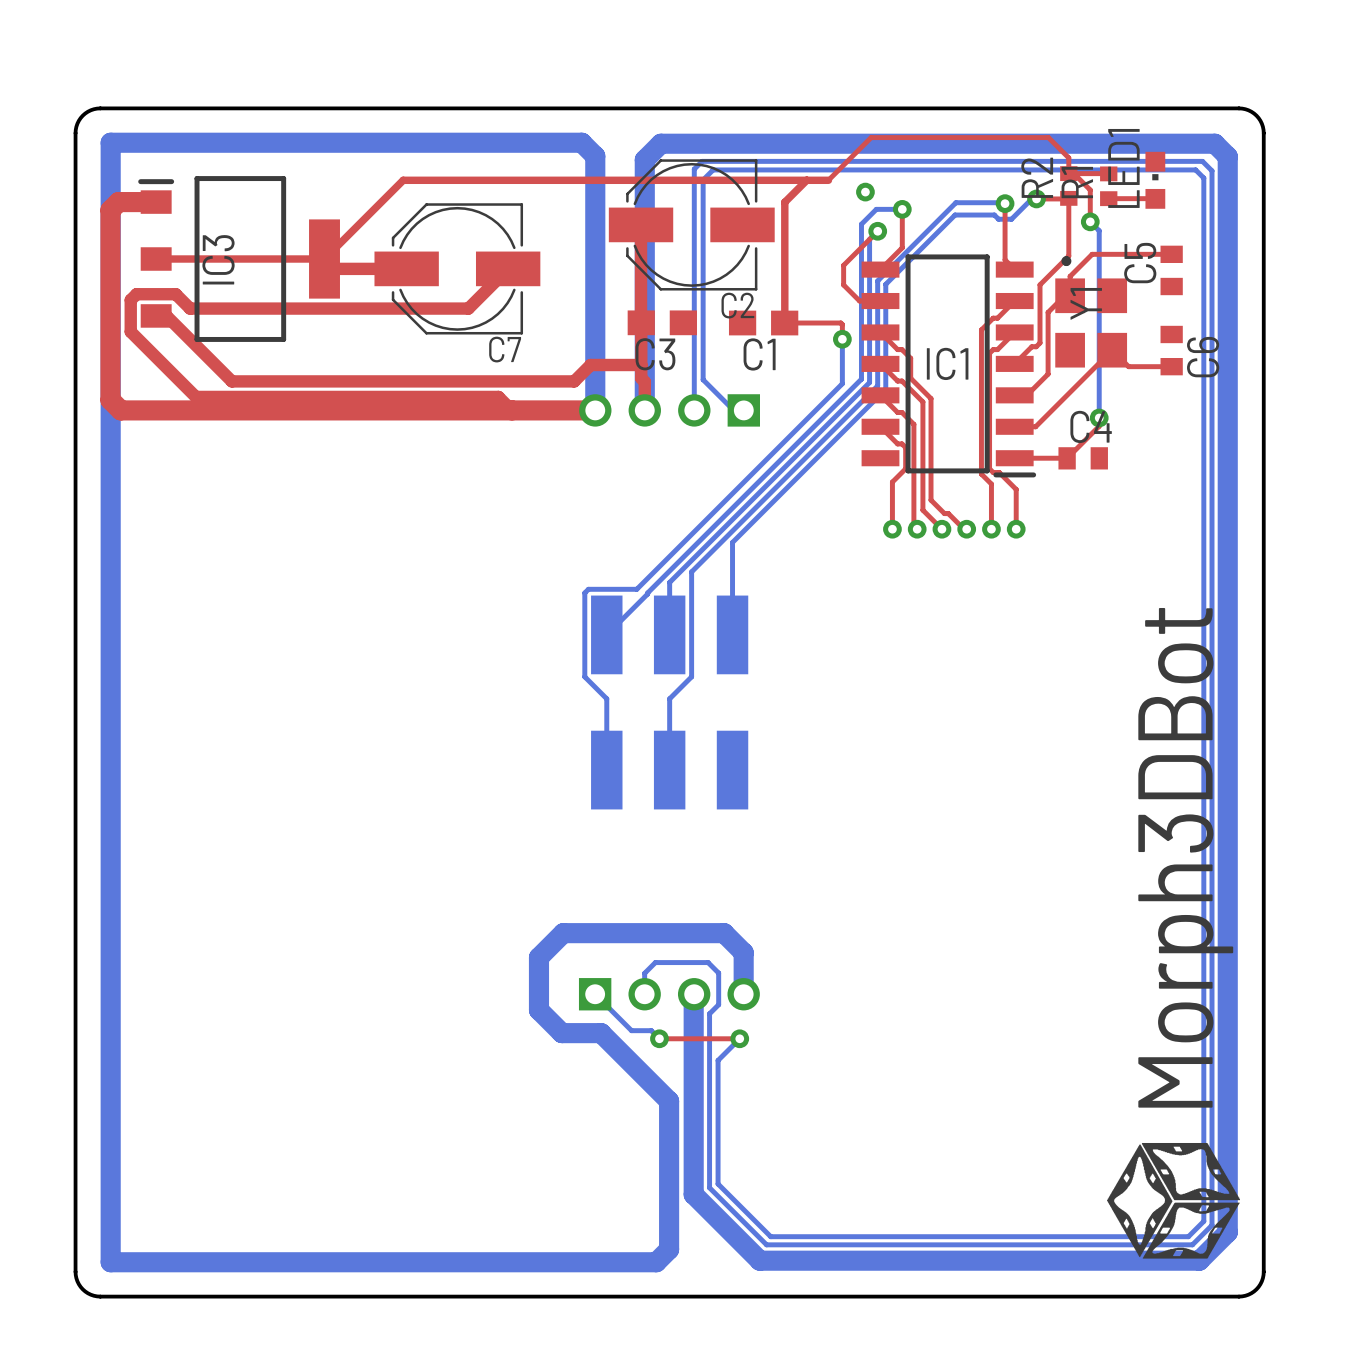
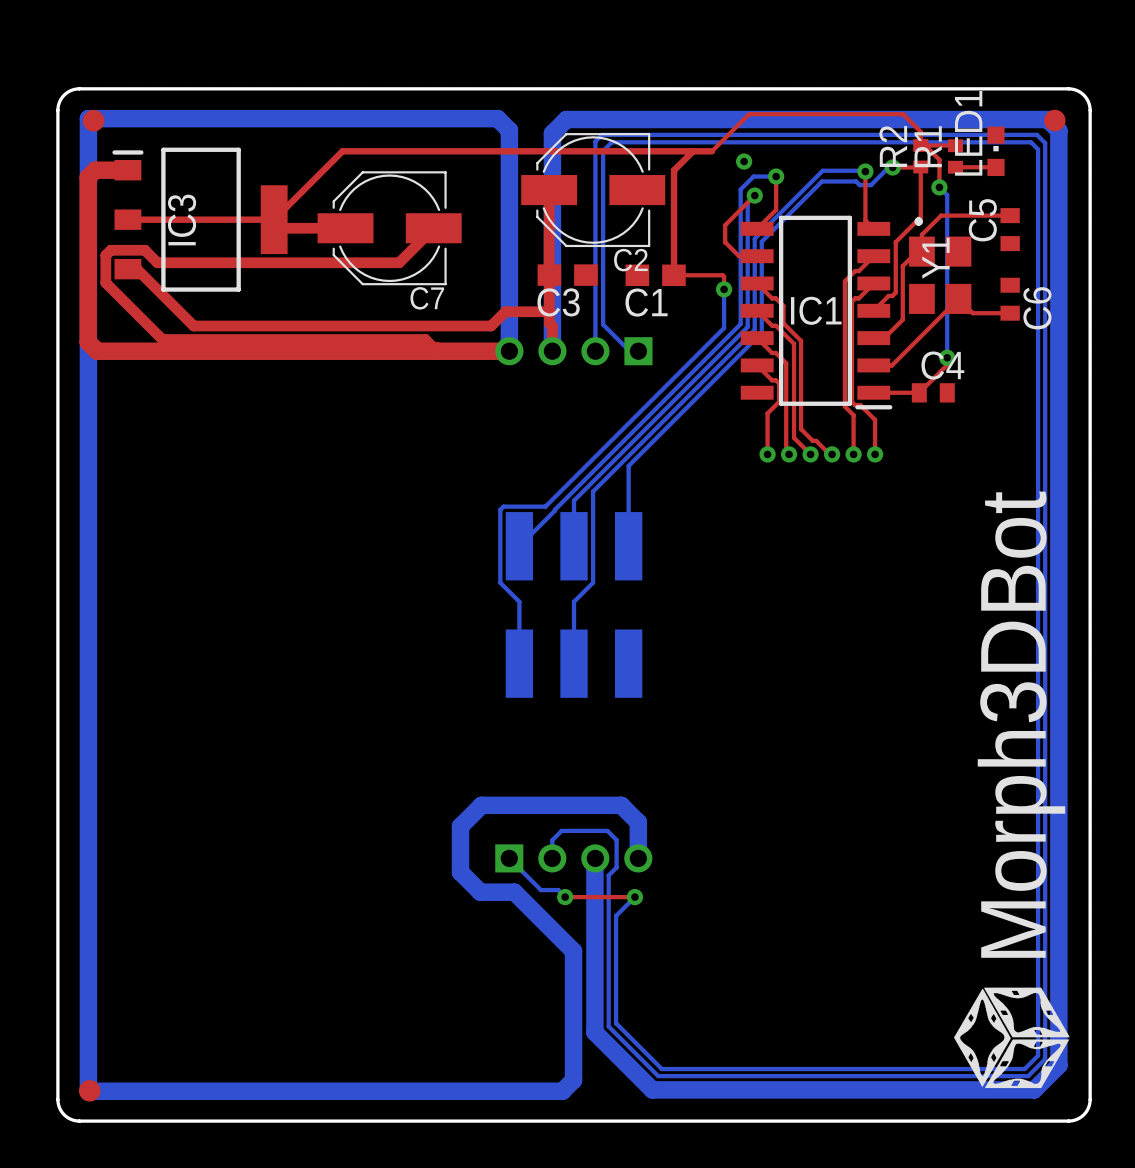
part: none -> (1054, 120)
part: none -> (93, 120)
part: none -> (89, 1090)

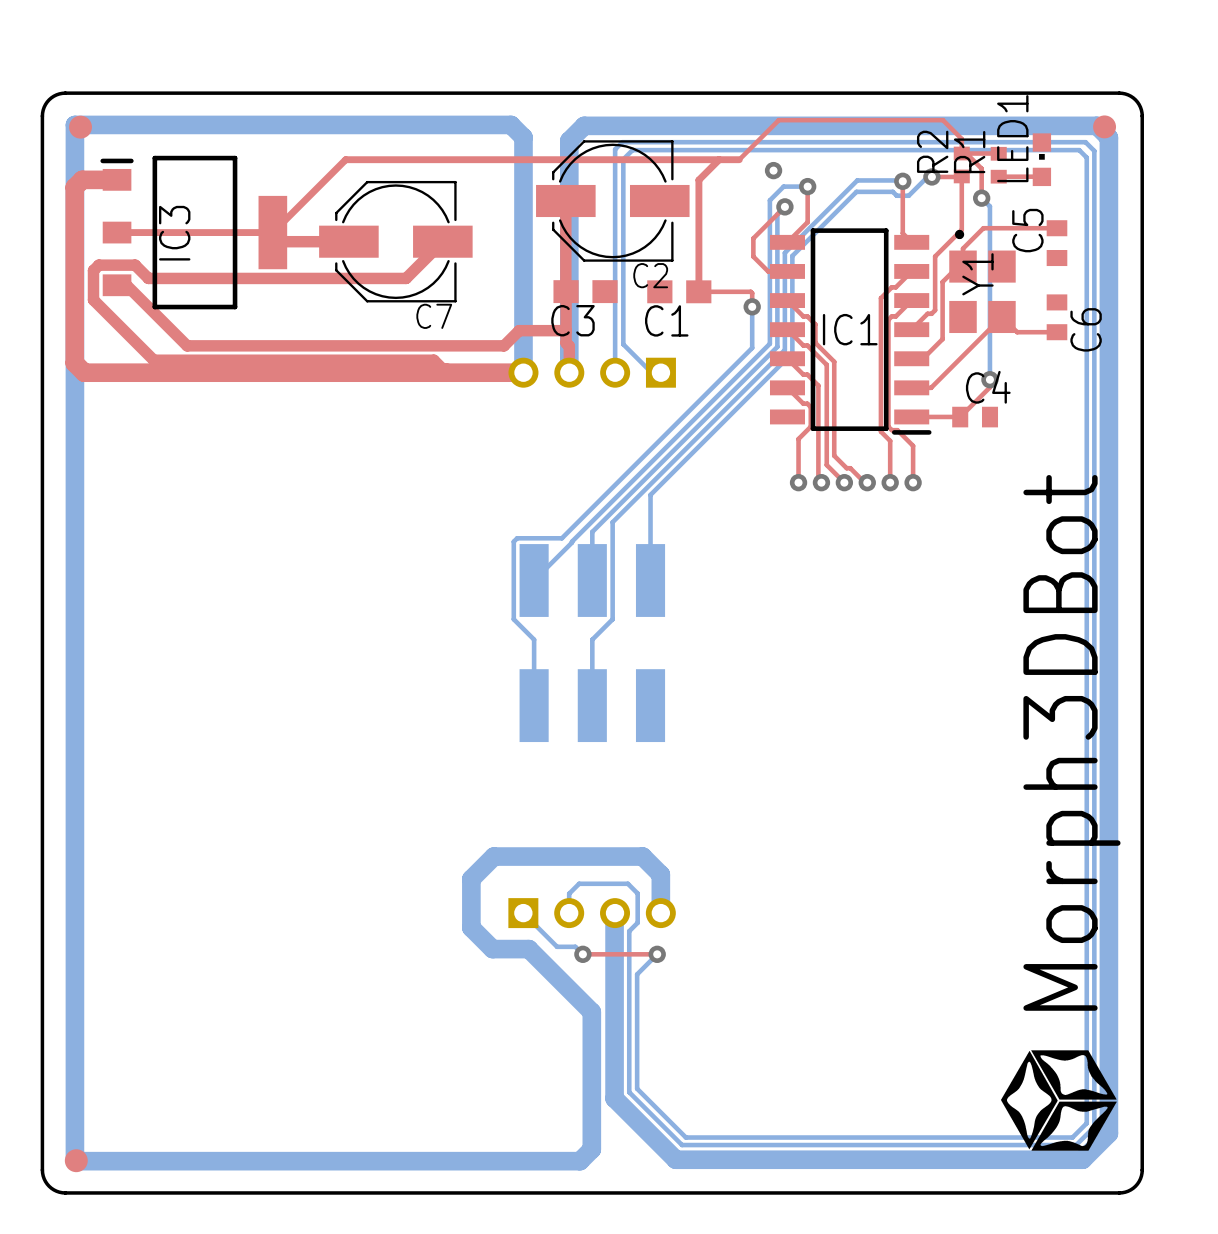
drawing shape: [953, 491, 1070, 1089] -> [1001, 475, 1121, 1151]

